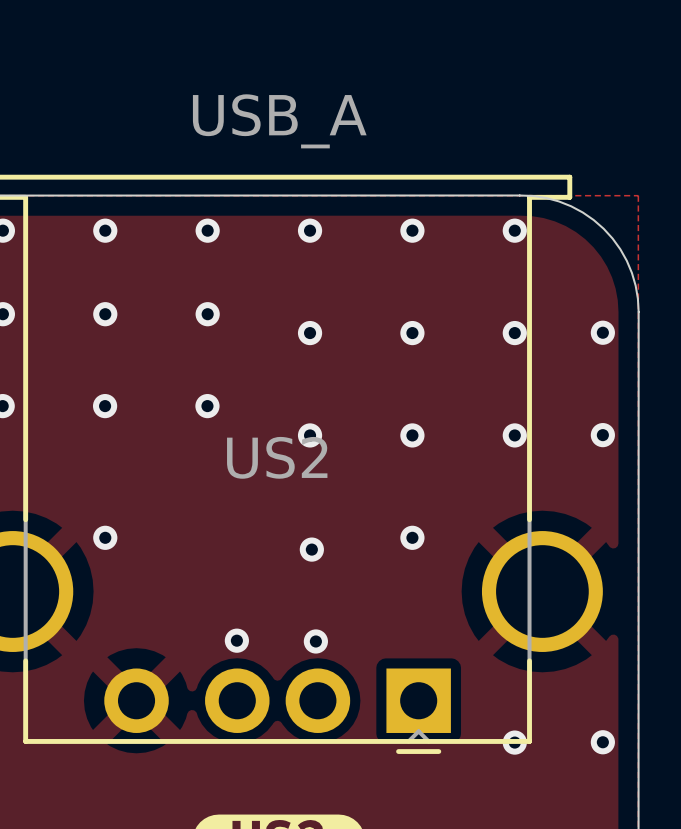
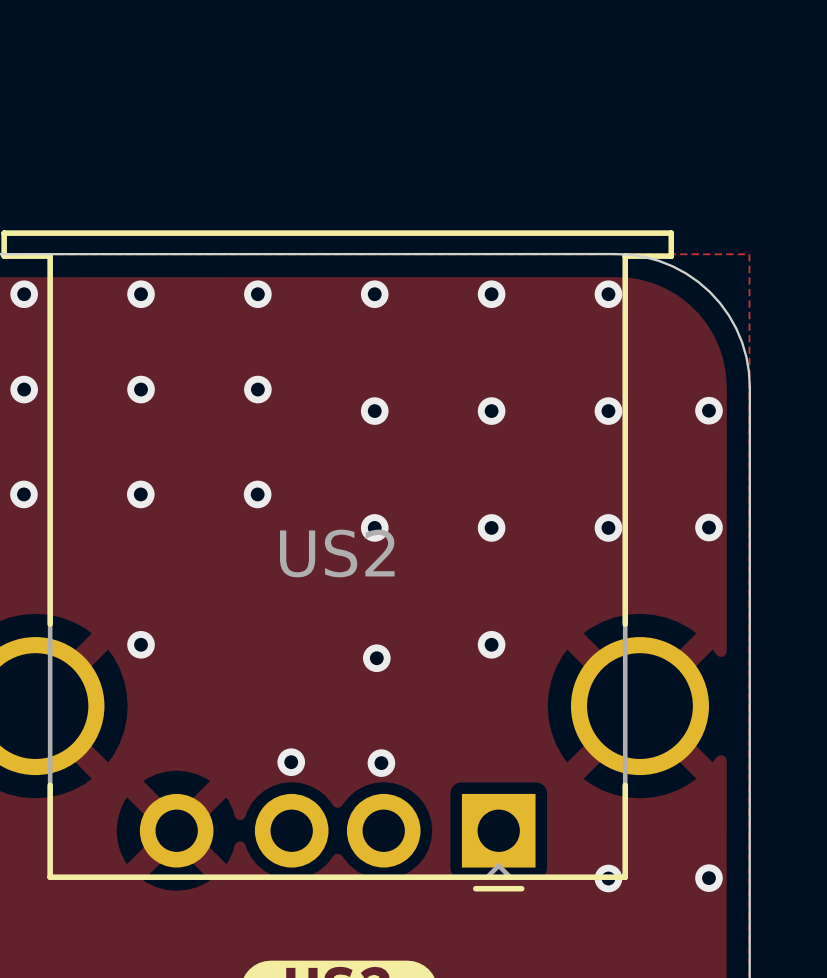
US2 value: USB_A (279, 121) -> none

